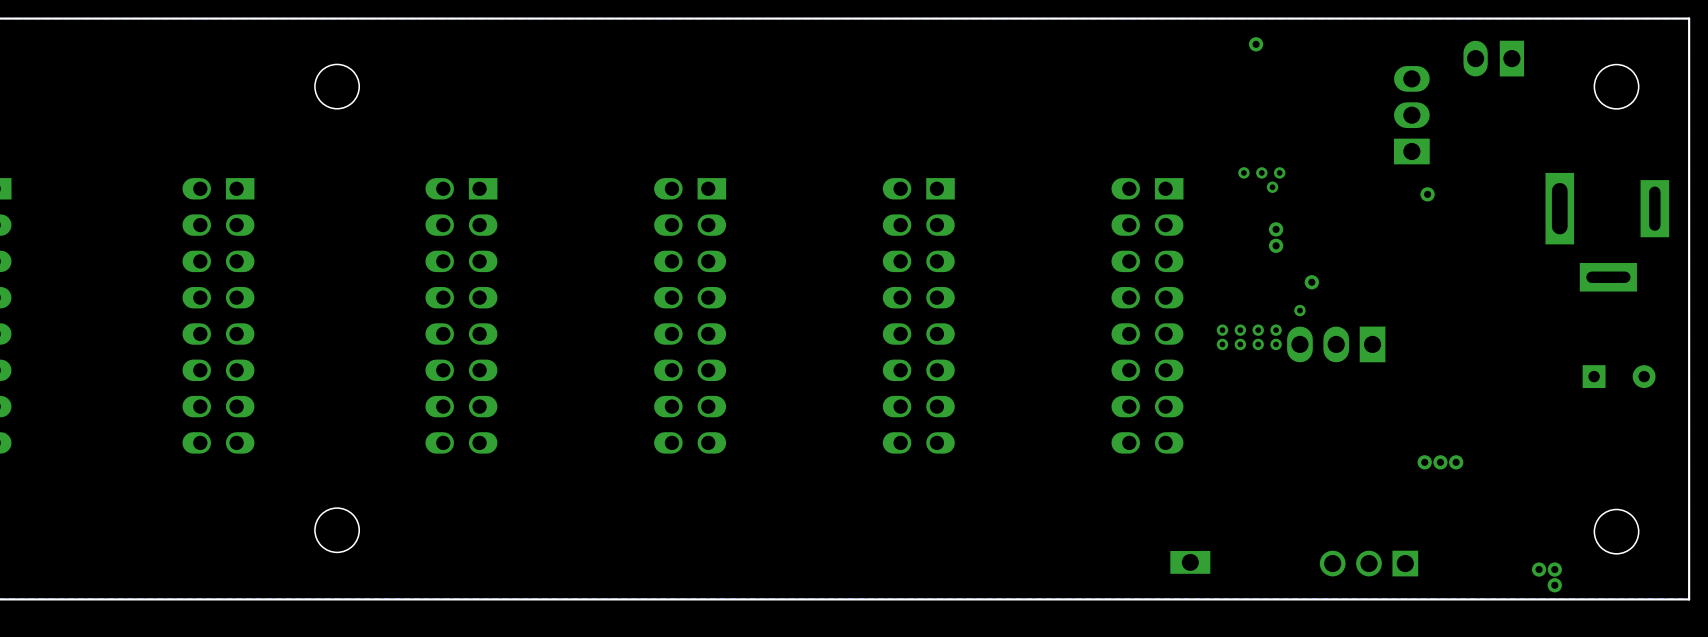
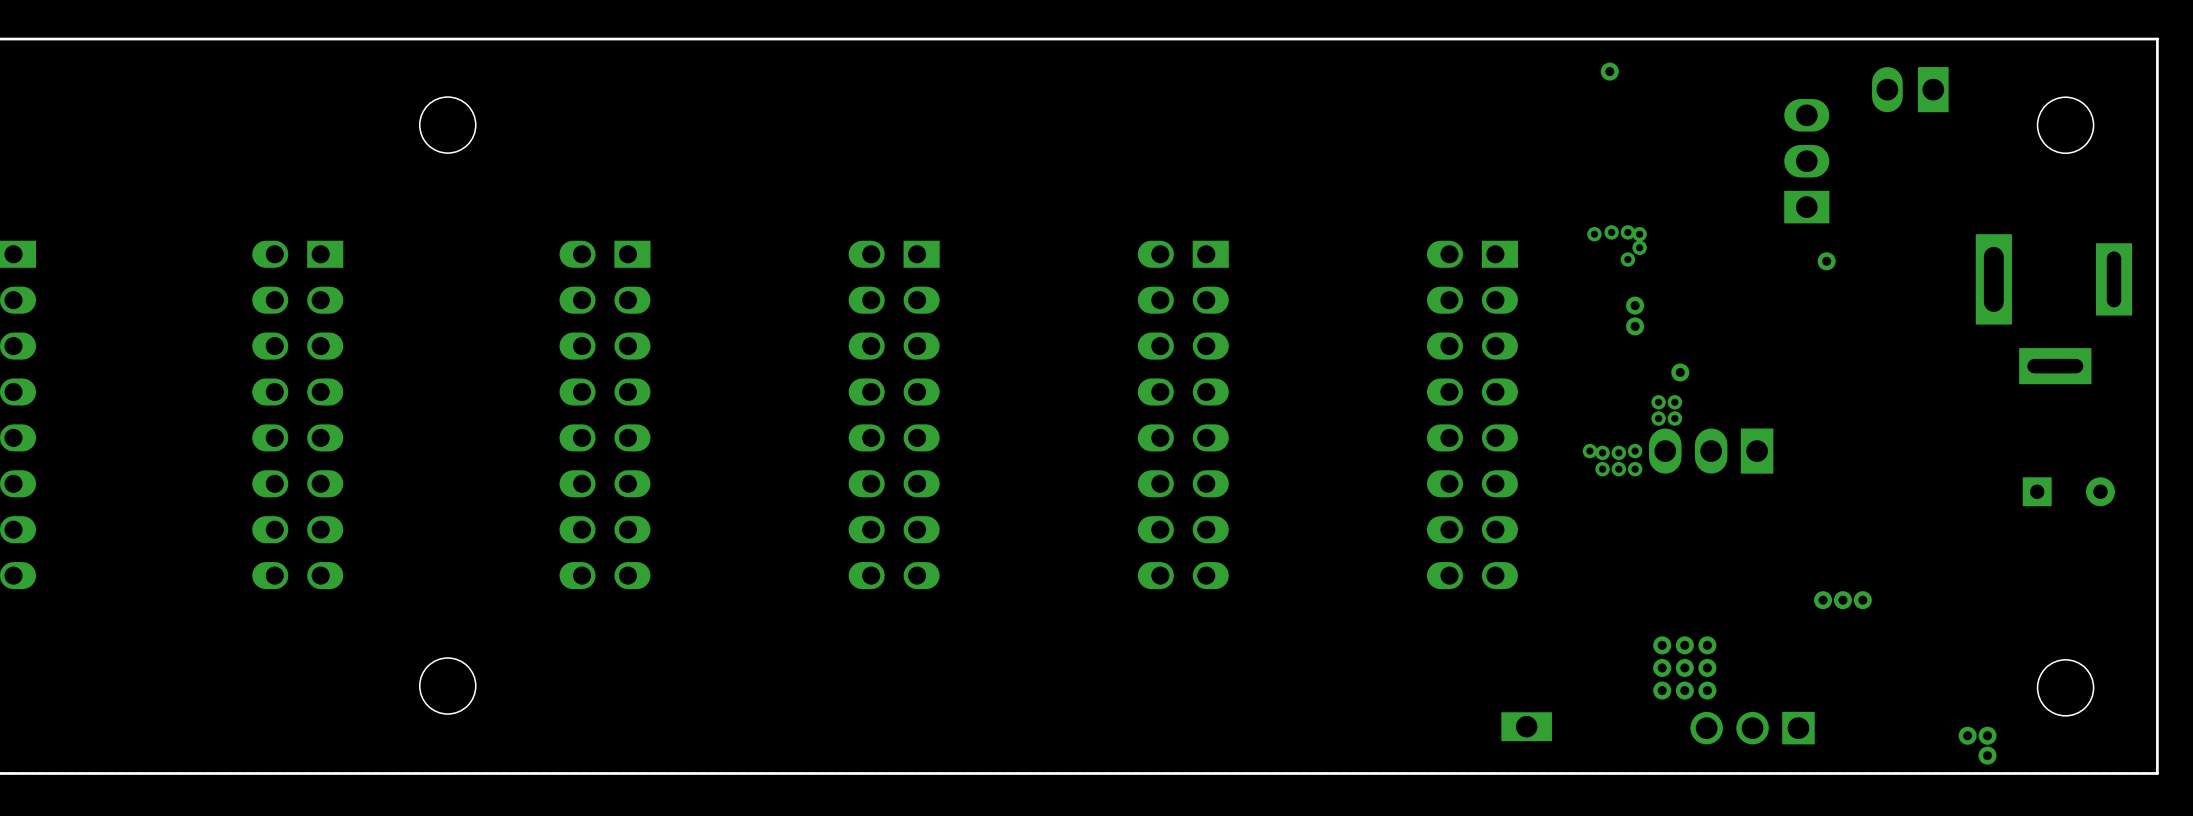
via: none -> (1611, 232)
via: none -> (1627, 232)
via: (1261, 172) -> none
via: none -> (1639, 247)
via: (1272, 187) -> none
via: none -> (1627, 259)
via: none -> (1658, 402)
via: none -> (1674, 402)
via: (1299, 310) -> none
via: none -> (1658, 418)
via: none -> (1674, 418)
via: (1222, 330) -> none
via: (1240, 330) -> none
via: (1258, 330) -> none
via: (1276, 330) -> none
via: (1222, 344) -> none
via: (1258, 344) -> none
via: none -> (1602, 452)
via: none -> (1618, 452)
via: none -> (1602, 469)
via: none -> (1618, 469)
via: none -> (1635, 469)
via: none -> (1662, 645)
via: none -> (1684, 645)
via: none -> (1707, 645)
via: none -> (1662, 667)
via: none -> (1684, 667)
via: none -> (1707, 667)
via: none -> (1662, 690)
via: none -> (1684, 690)
via: none -> (1707, 690)

